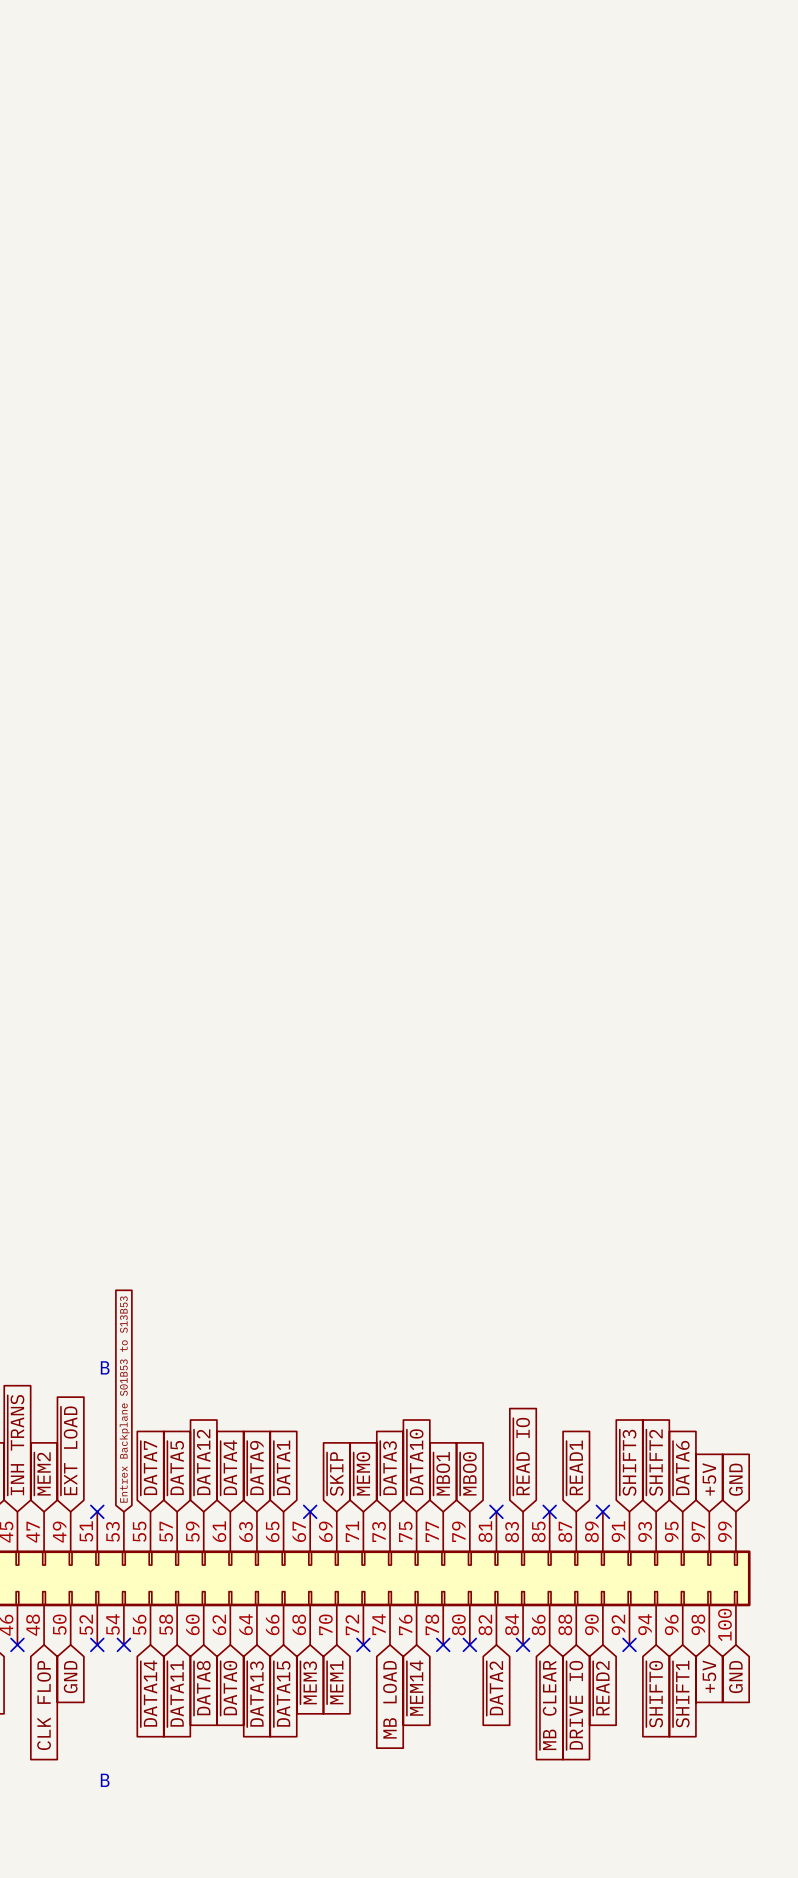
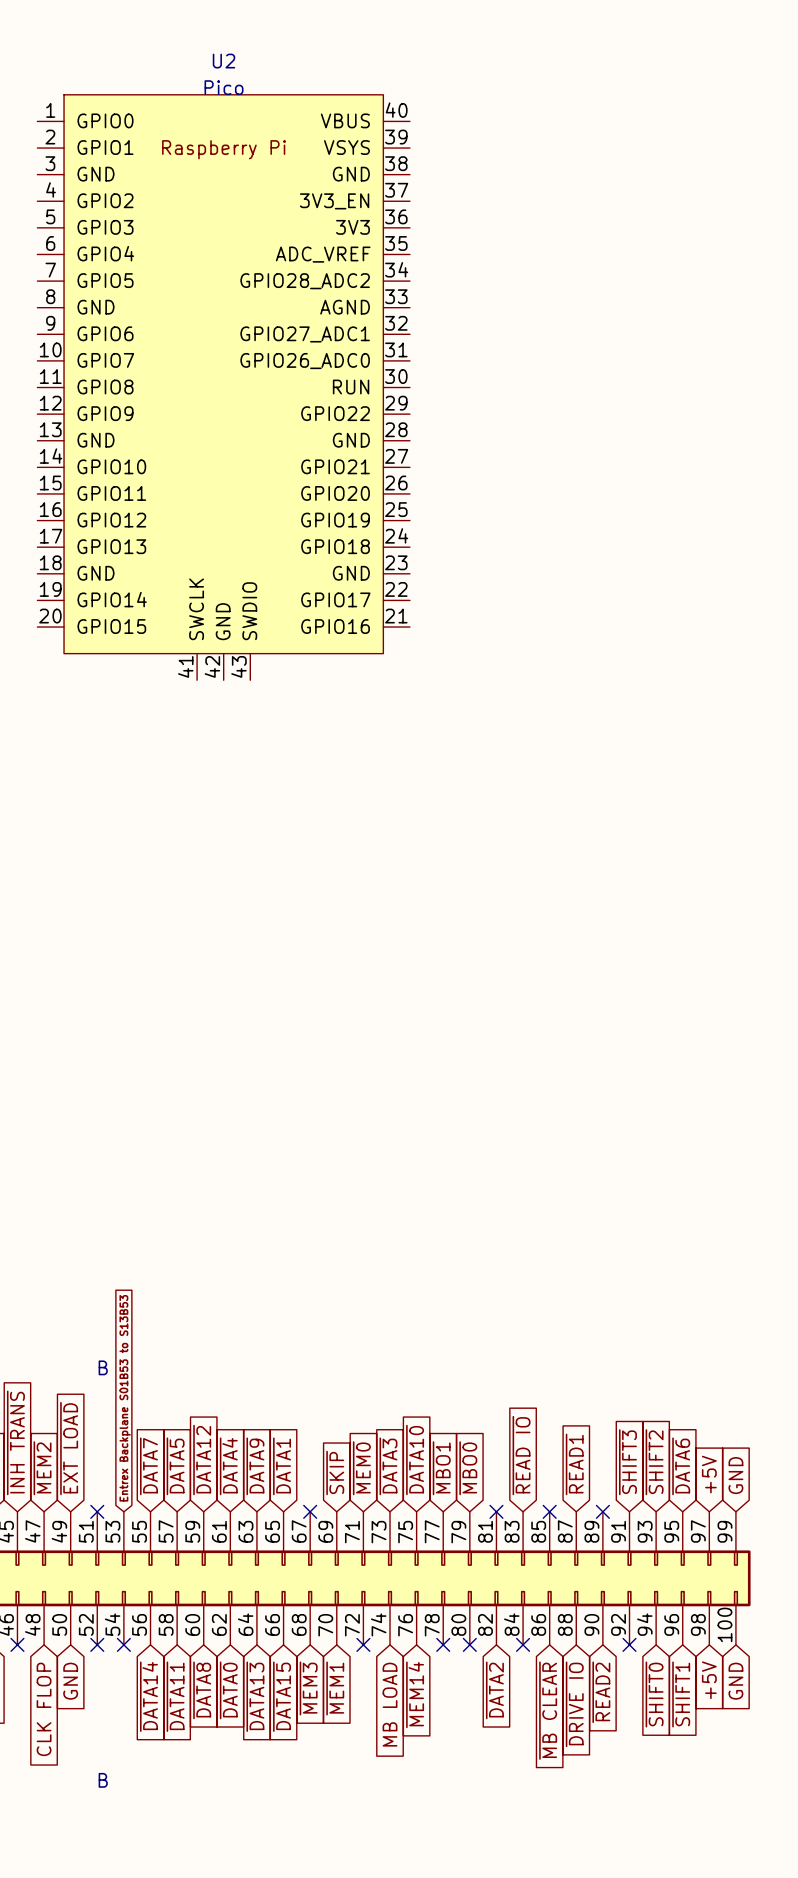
U2: none -> Pico (223, 387)

